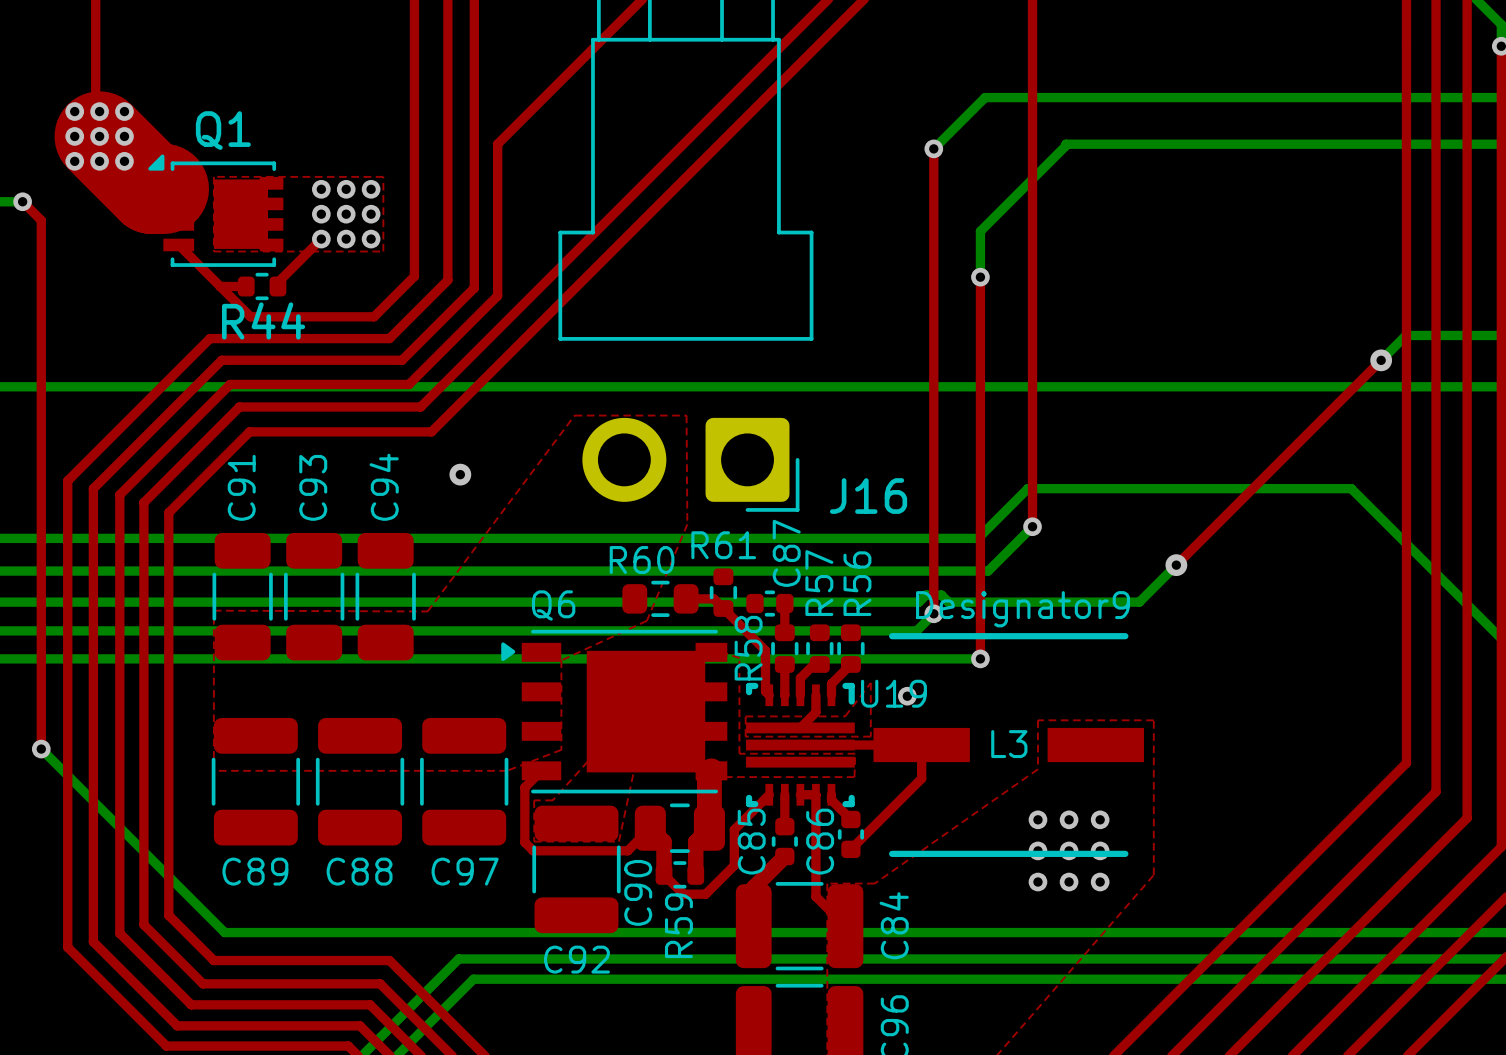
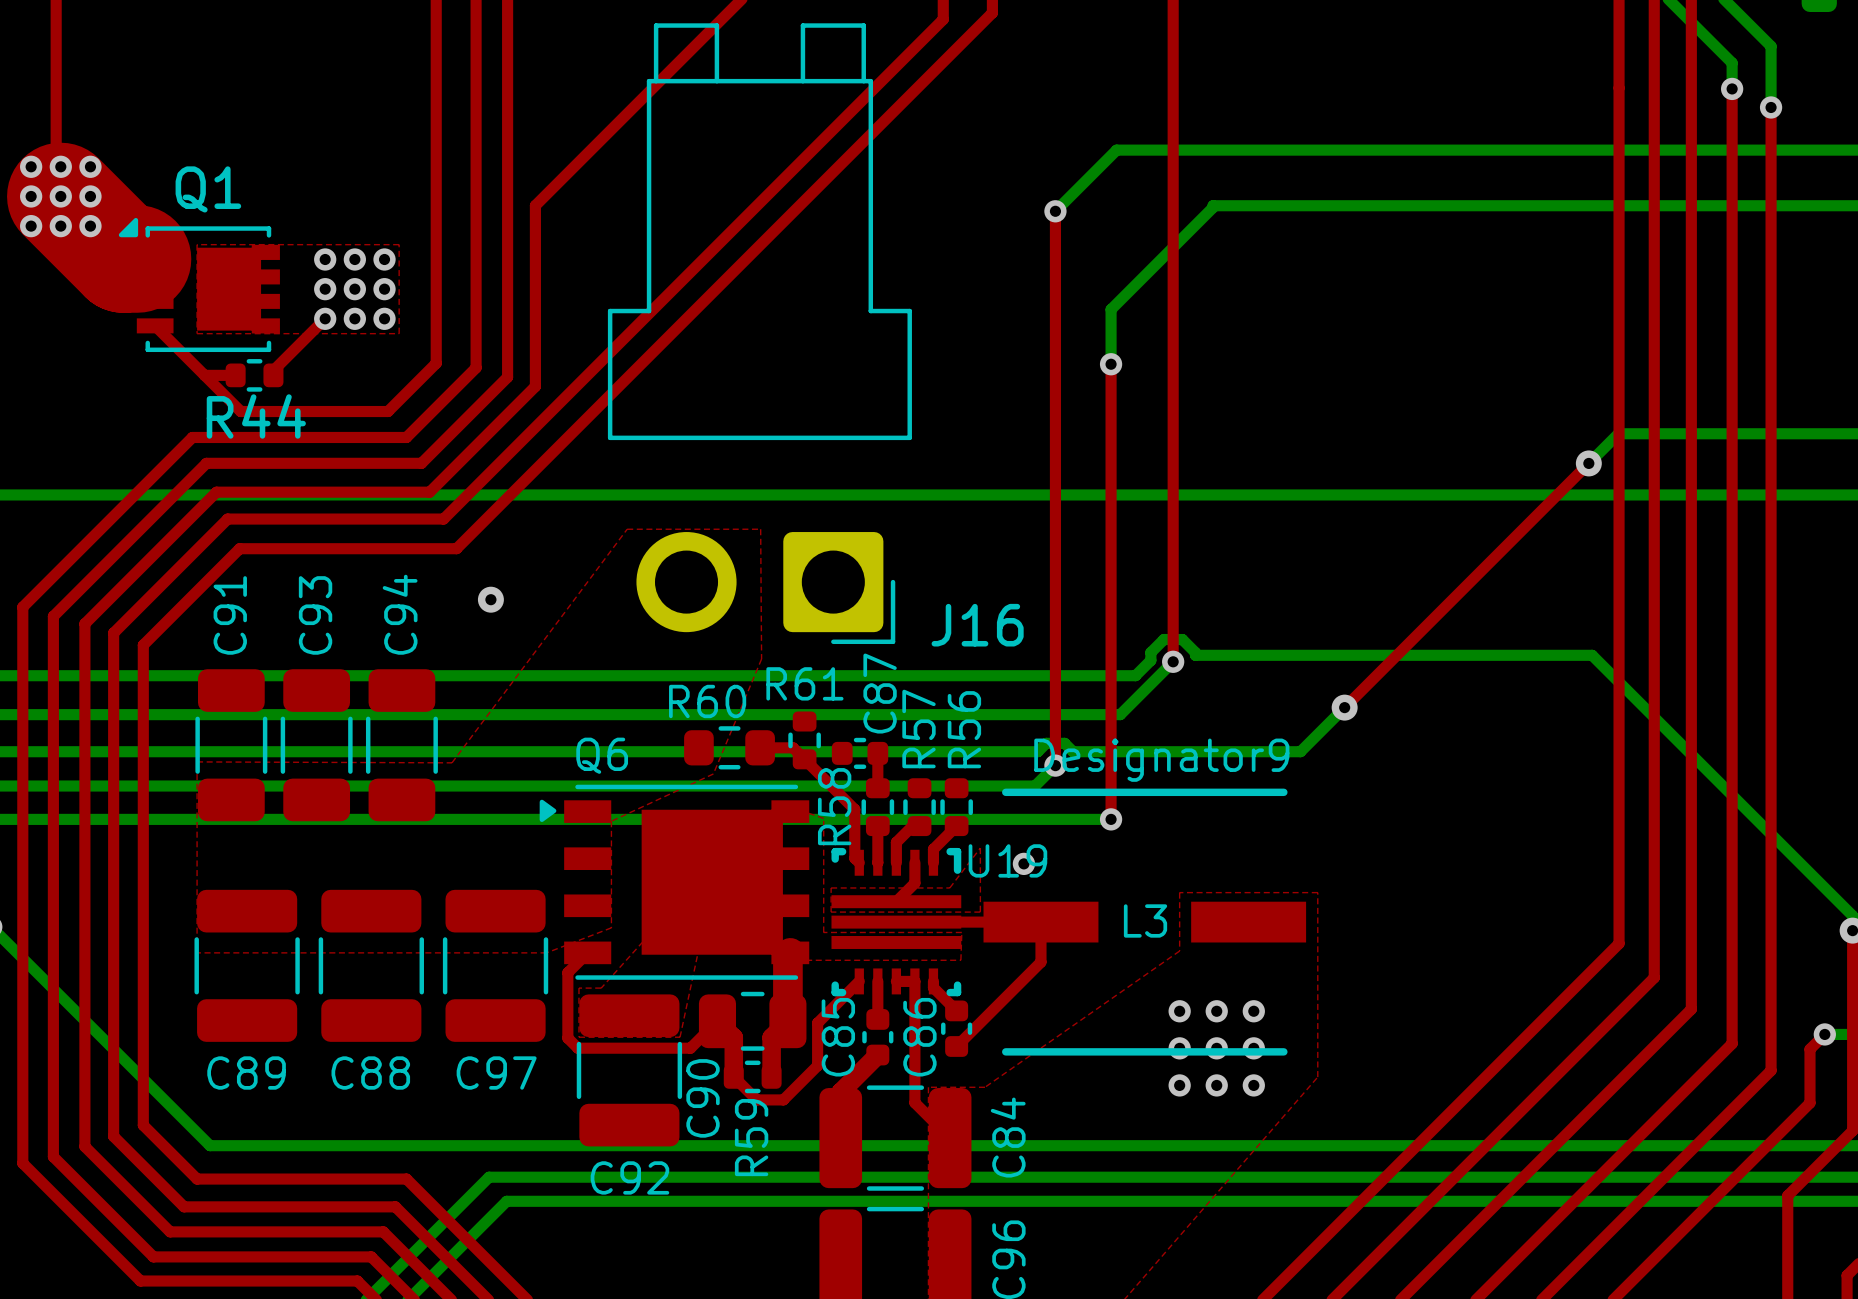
bottom track: (1383, 521) (1351, 488) (1027, 488) (978, 538) -> (1592, 655) (1195, 655) (1195, 652) (1182, 639) (1163, 639) (1150, 652) (1150, 660) (1135, 675) (1108, 675)

